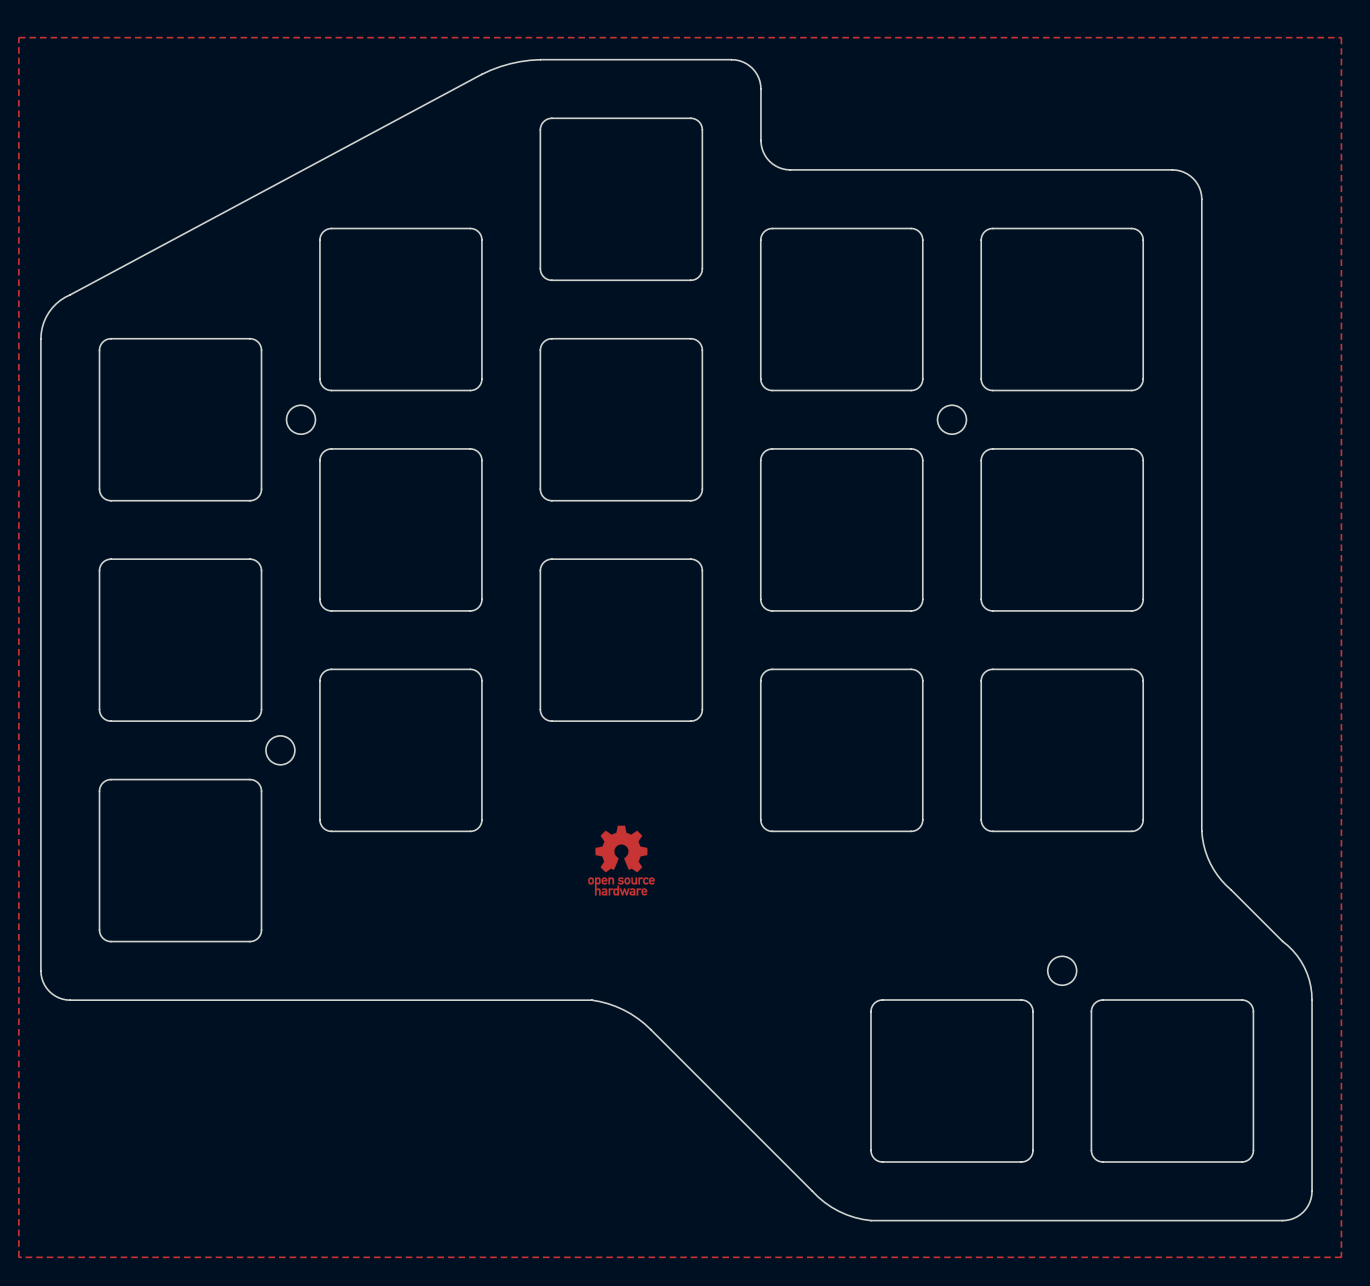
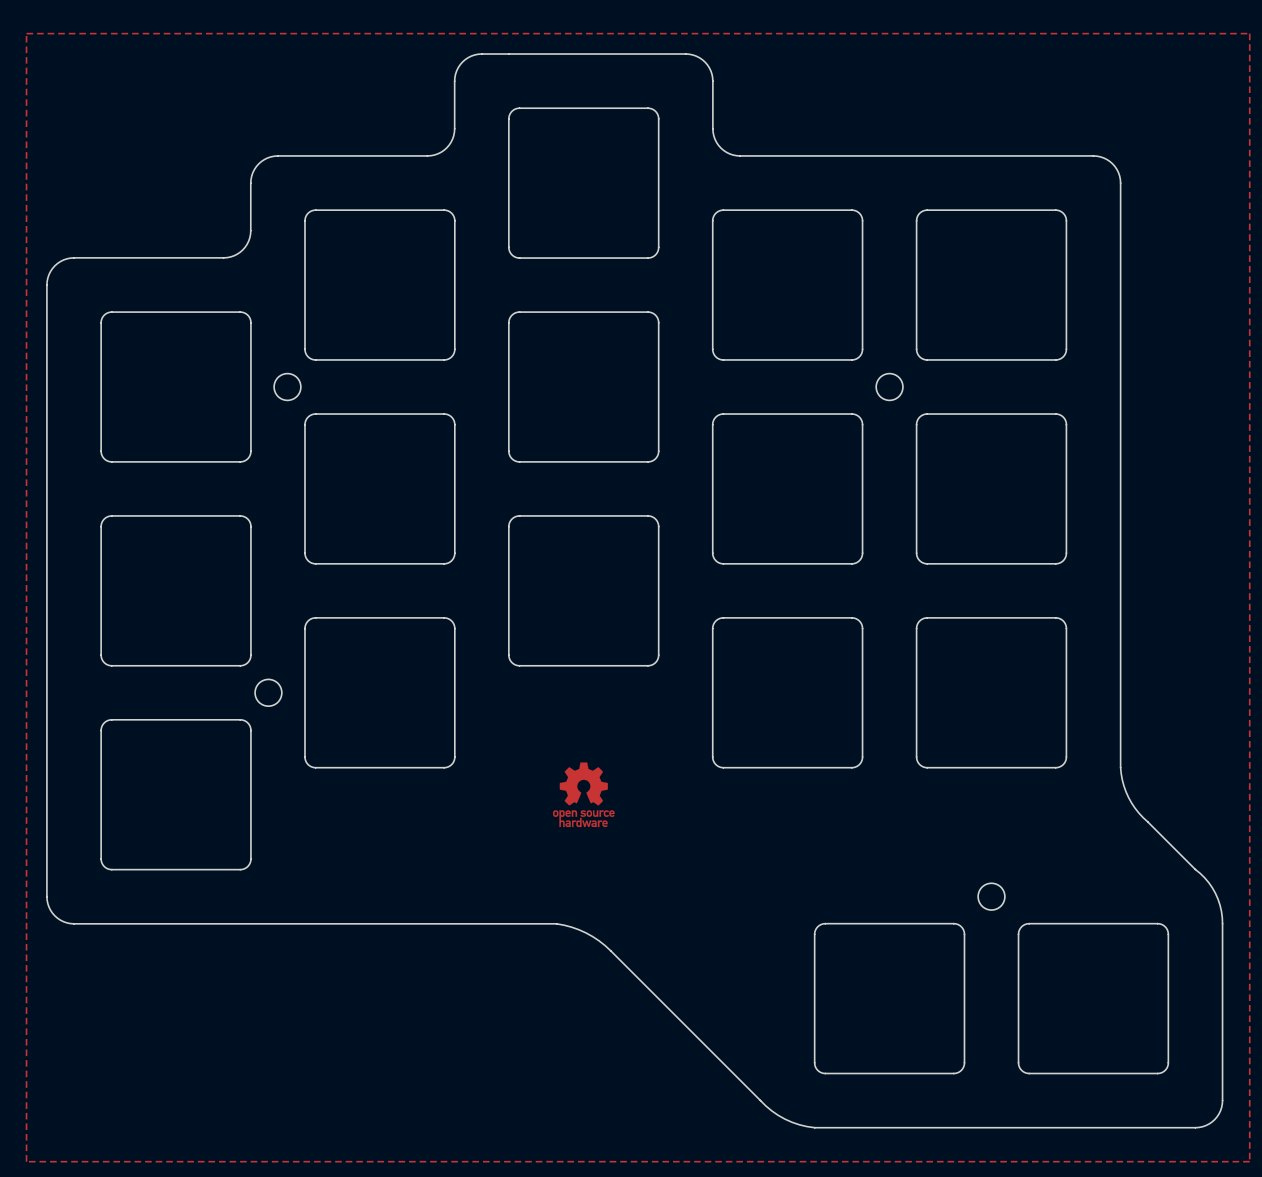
board edge: (540, 59) (510, 63) (481, 74) (65, 297) (48, 312) (43, 322) (40, 338) -> (509, 54) (474, 54) (460, 64) (454, 77) (453, 135) (449, 145) (441, 152) (427, 155) (277, 155) (267, 158) (256, 166) (251, 176) (250, 234) (247, 244) (240, 252) (223, 257) (67, 258) (57, 263) (48, 274) (46, 312)

